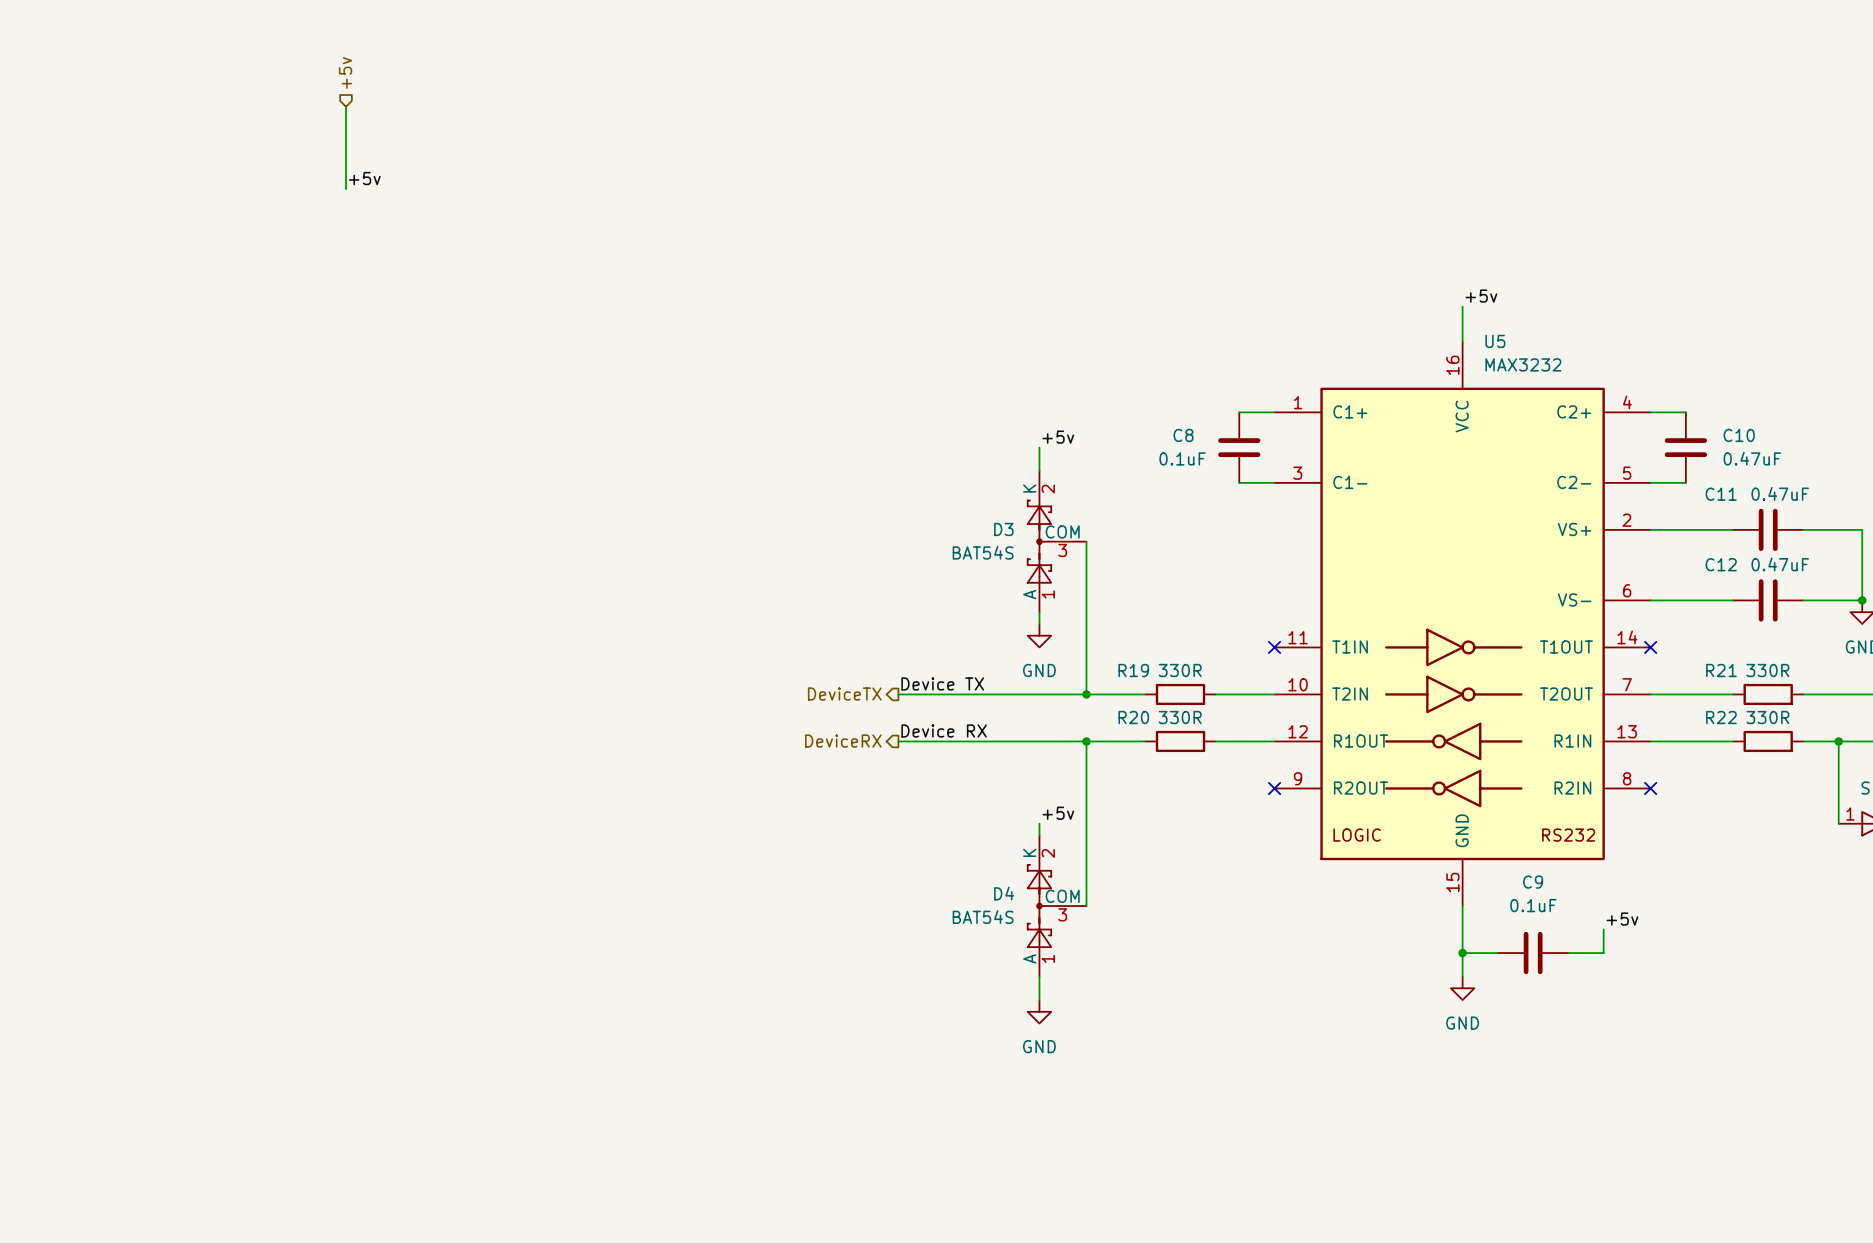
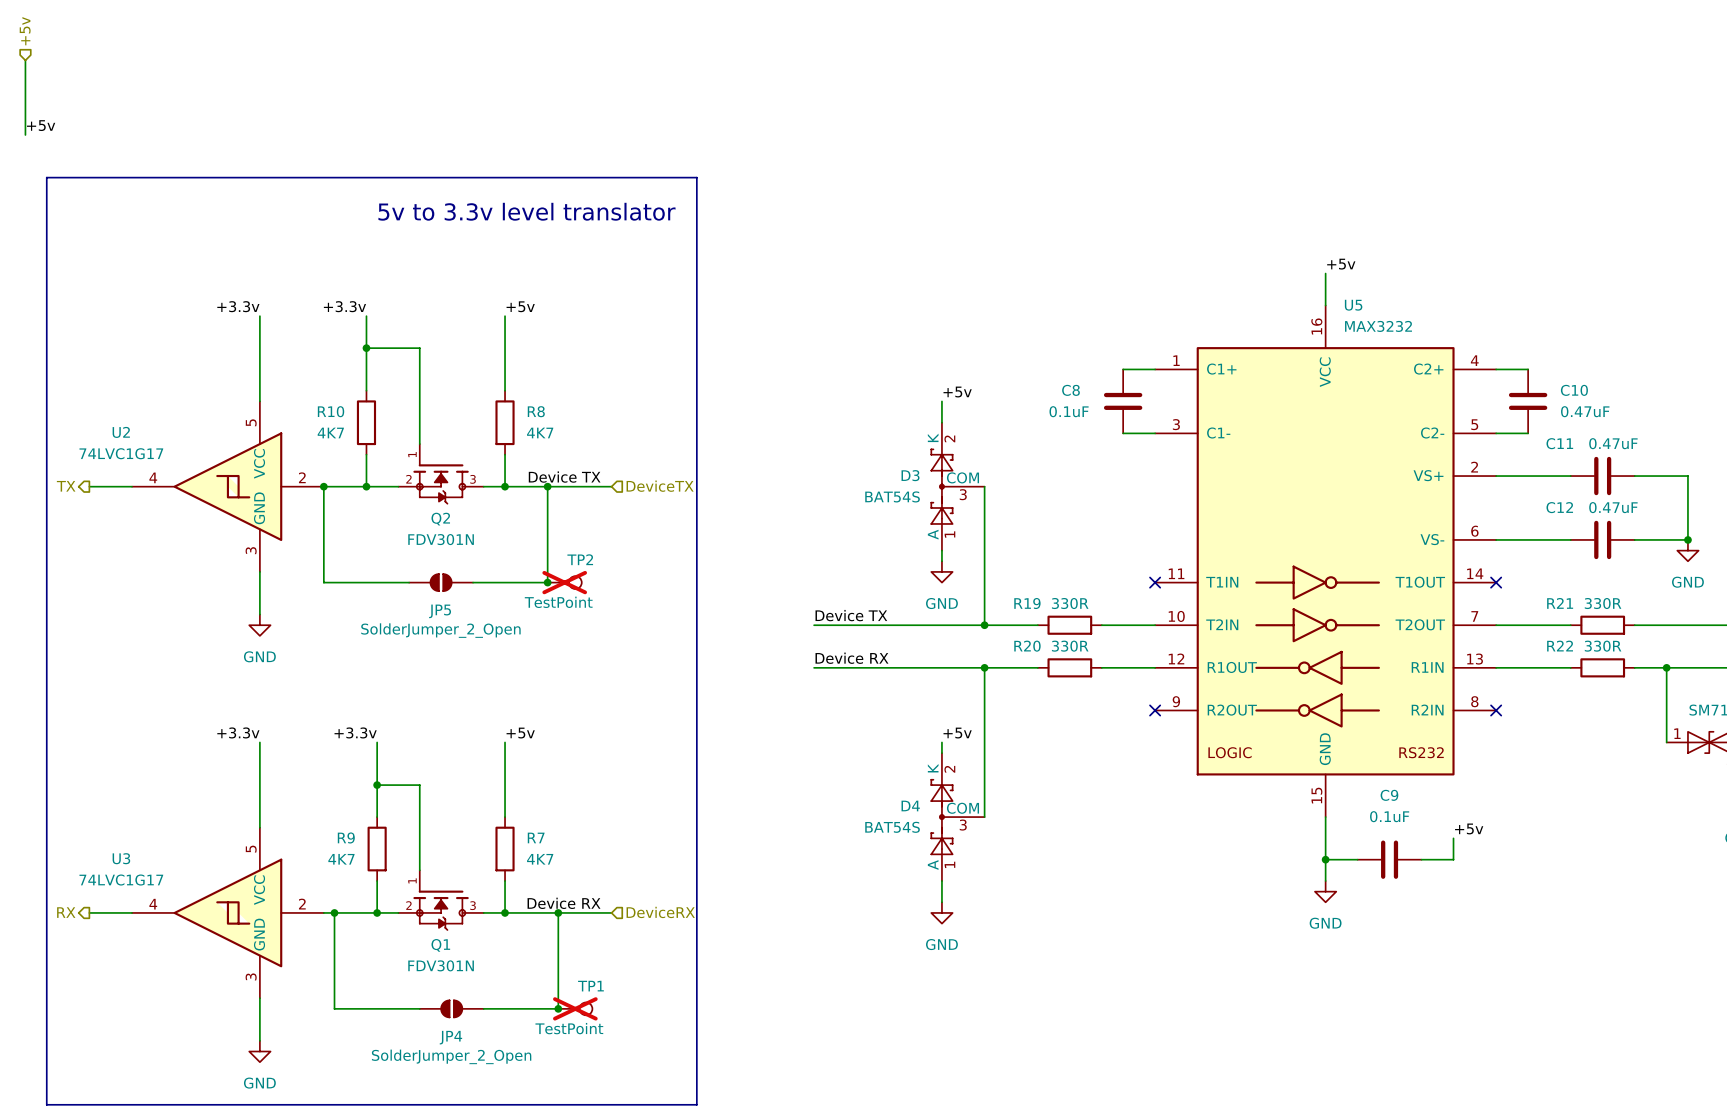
hierarchical label: none -> +5v (25, 31)
wire: none -> (25, 60) (25, 134)
hierarchical label: +5v (345, 73) -> none
wire: (345, 106) (345, 189) -> none
label: none -> +5v (41, 125)
label: +5v (364, 178) -> none
line: none -> (46, 177) (696, 177) (696, 1104) (46, 1104) (46, 177)
text: none -> 5v to 3.3v level translator (526, 211)
label: none -> +3.3v (238, 306)
label: none -> +3.3v (344, 306)
label: none -> +5v (520, 306)
wire: none -> (259, 316) (259, 401)
wire: none -> (366, 316) (366, 390)
wire: none -> (505, 316) (505, 390)
wire: none -> (366, 348) (419, 348) (419, 444)
junction: none -> (366, 348)
R10: none -> 4K7 (366, 422)
R8: none -> 4K7 (505, 422)
wire: none -> (366, 454) (366, 486)
wire: none -> (505, 454) (505, 486)
Q2: none -> FDV301N (441, 474)
label: none -> Device TX (564, 477)
hierarchical label: none -> TX (66, 486)
wire: none -> (89, 486) (132, 486)
U2: none -> 74LVC1G17 (227, 486)
junction: none -> (323, 486)
junction: none -> (366, 486)
wire: none -> (398, 486) (323, 486) (323, 582) (409, 582)
wire: none -> (483, 486) (611, 486)
junction: none -> (505, 486)
wire: none -> (547, 486) (547, 582) (473, 582)
junction: none -> (547, 486)
hierarchical label: none -> DeviceTX (660, 486)
wire: none -> (259, 571) (259, 614)
JP5: none -> SolderJumper_2_Open (441, 582)
junction: none -> (547, 582)
TP2: none -> TestPoint (564, 582)
power symbol: none -> GND (259, 625)
hierarchical label: DeviceTX (844, 694) -> none
hierarchical label: DeviceRX (843, 741) -> none
label: none -> +3.3v (238, 732)
label: none -> +3.3v (355, 732)
label: none -> +5v (520, 733)
wire: none -> (259, 742) (259, 827)
wire: none -> (377, 742) (377, 817)
wire: none -> (505, 742) (505, 817)
wire: none -> (377, 785) (419, 785) (419, 870)
junction: none -> (377, 785)
R9: none -> 4K7 (377, 849)
R7: none -> 4K7 (505, 849)
wire: none -> (377, 880) (377, 912)
wire: none -> (505, 880) (505, 912)
Q1: none -> FDV301N (441, 900)
label: none -> Device RX (564, 903)
hierarchical label: none -> RX (66, 912)
wire: none -> (89, 912) (132, 912)
U3: none -> 74LVC1G17 (227, 912)
wire: none -> (323, 912) (398, 912)
wire: none -> (334, 912) (334, 1008) (419, 1008)
junction: none -> (334, 912)
junction: none -> (377, 912)
wire: none -> (483, 912) (611, 912)
junction: none -> (505, 912)
wire: none -> (558, 912) (558, 1008) (483, 1008)
junction: none -> (558, 912)
hierarchical label: none -> DeviceRX (660, 912)
wire: none -> (259, 998) (259, 1040)
JP4: none -> SolderJumper_2_Open (451, 1008)
junction: none -> (558, 1008)
TP1: none -> TestPoint (575, 1008)
power symbol: none -> GND (259, 1051)

